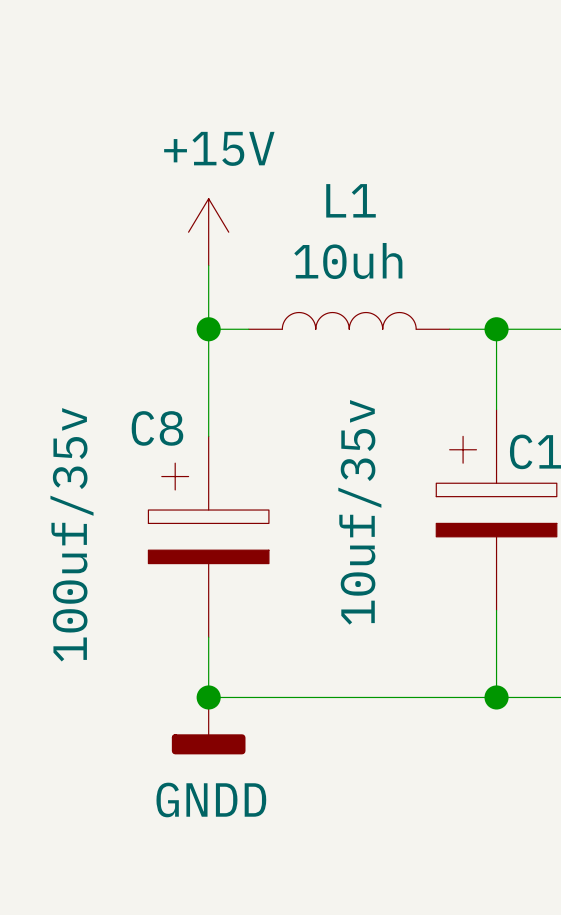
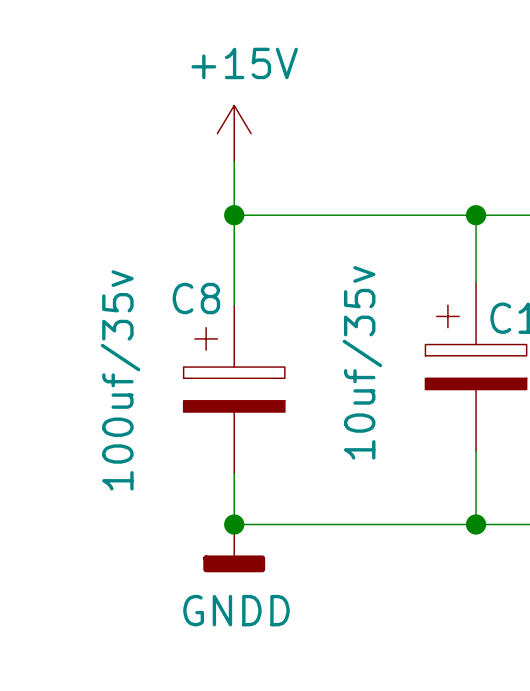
L1: 10uh (349, 320) -> none
wire: none -> (267, 215) (436, 215)

